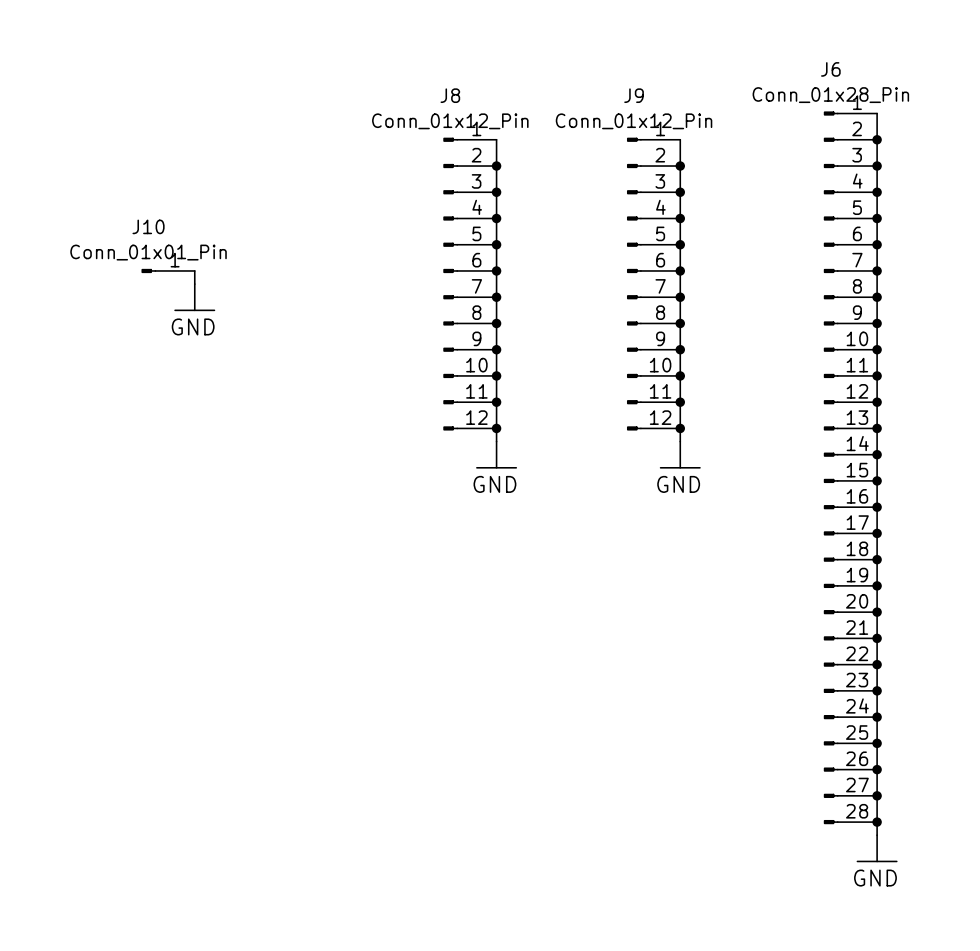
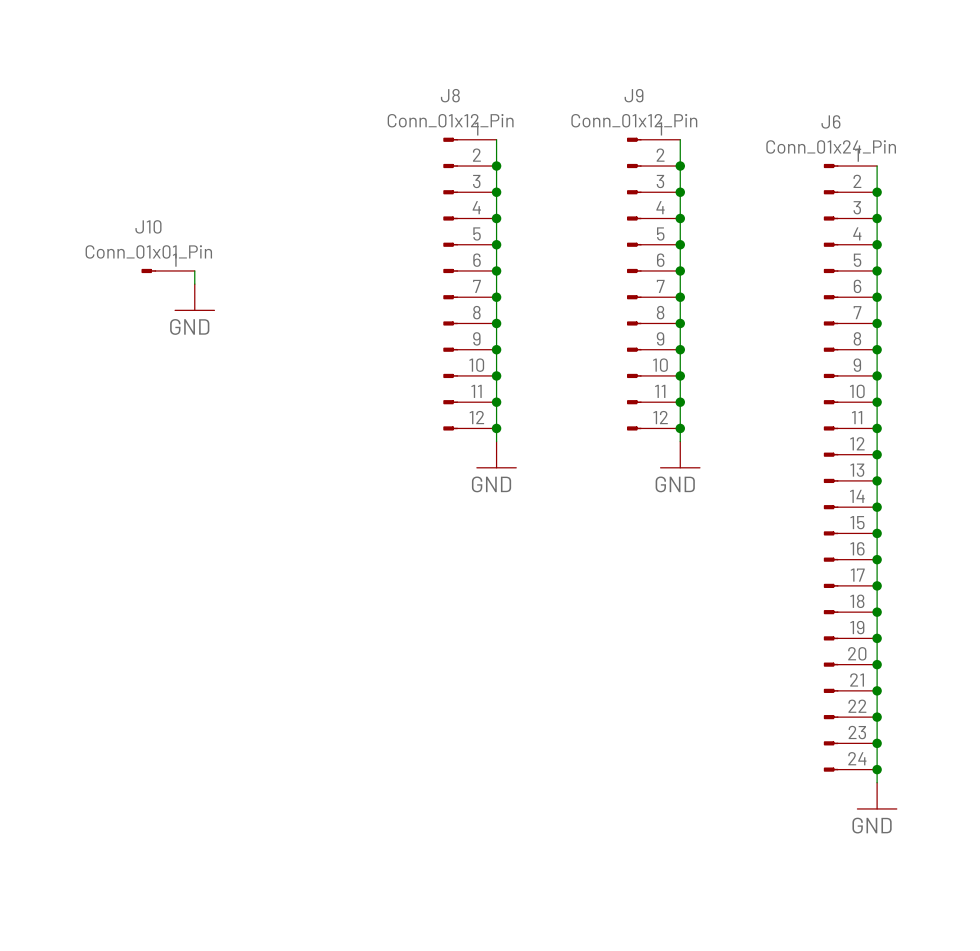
J6 name position: J6 (830, 69) -> J6 (830, 121)
J6 value: Conn_01x28_Pin (830, 95) -> Conn_01x24_Pin (831, 146)
J6 symbol: [823, 111, 878, 825] -> [823, 163, 878, 772]
wire: (877, 113) (877, 166) -> none
junction: (877, 139) -> none
junction: (877, 166) -> none
junction: (877, 795) -> none
junction: (877, 822) -> none
power symbol position: GND (877, 848) -> GND (877, 795)

